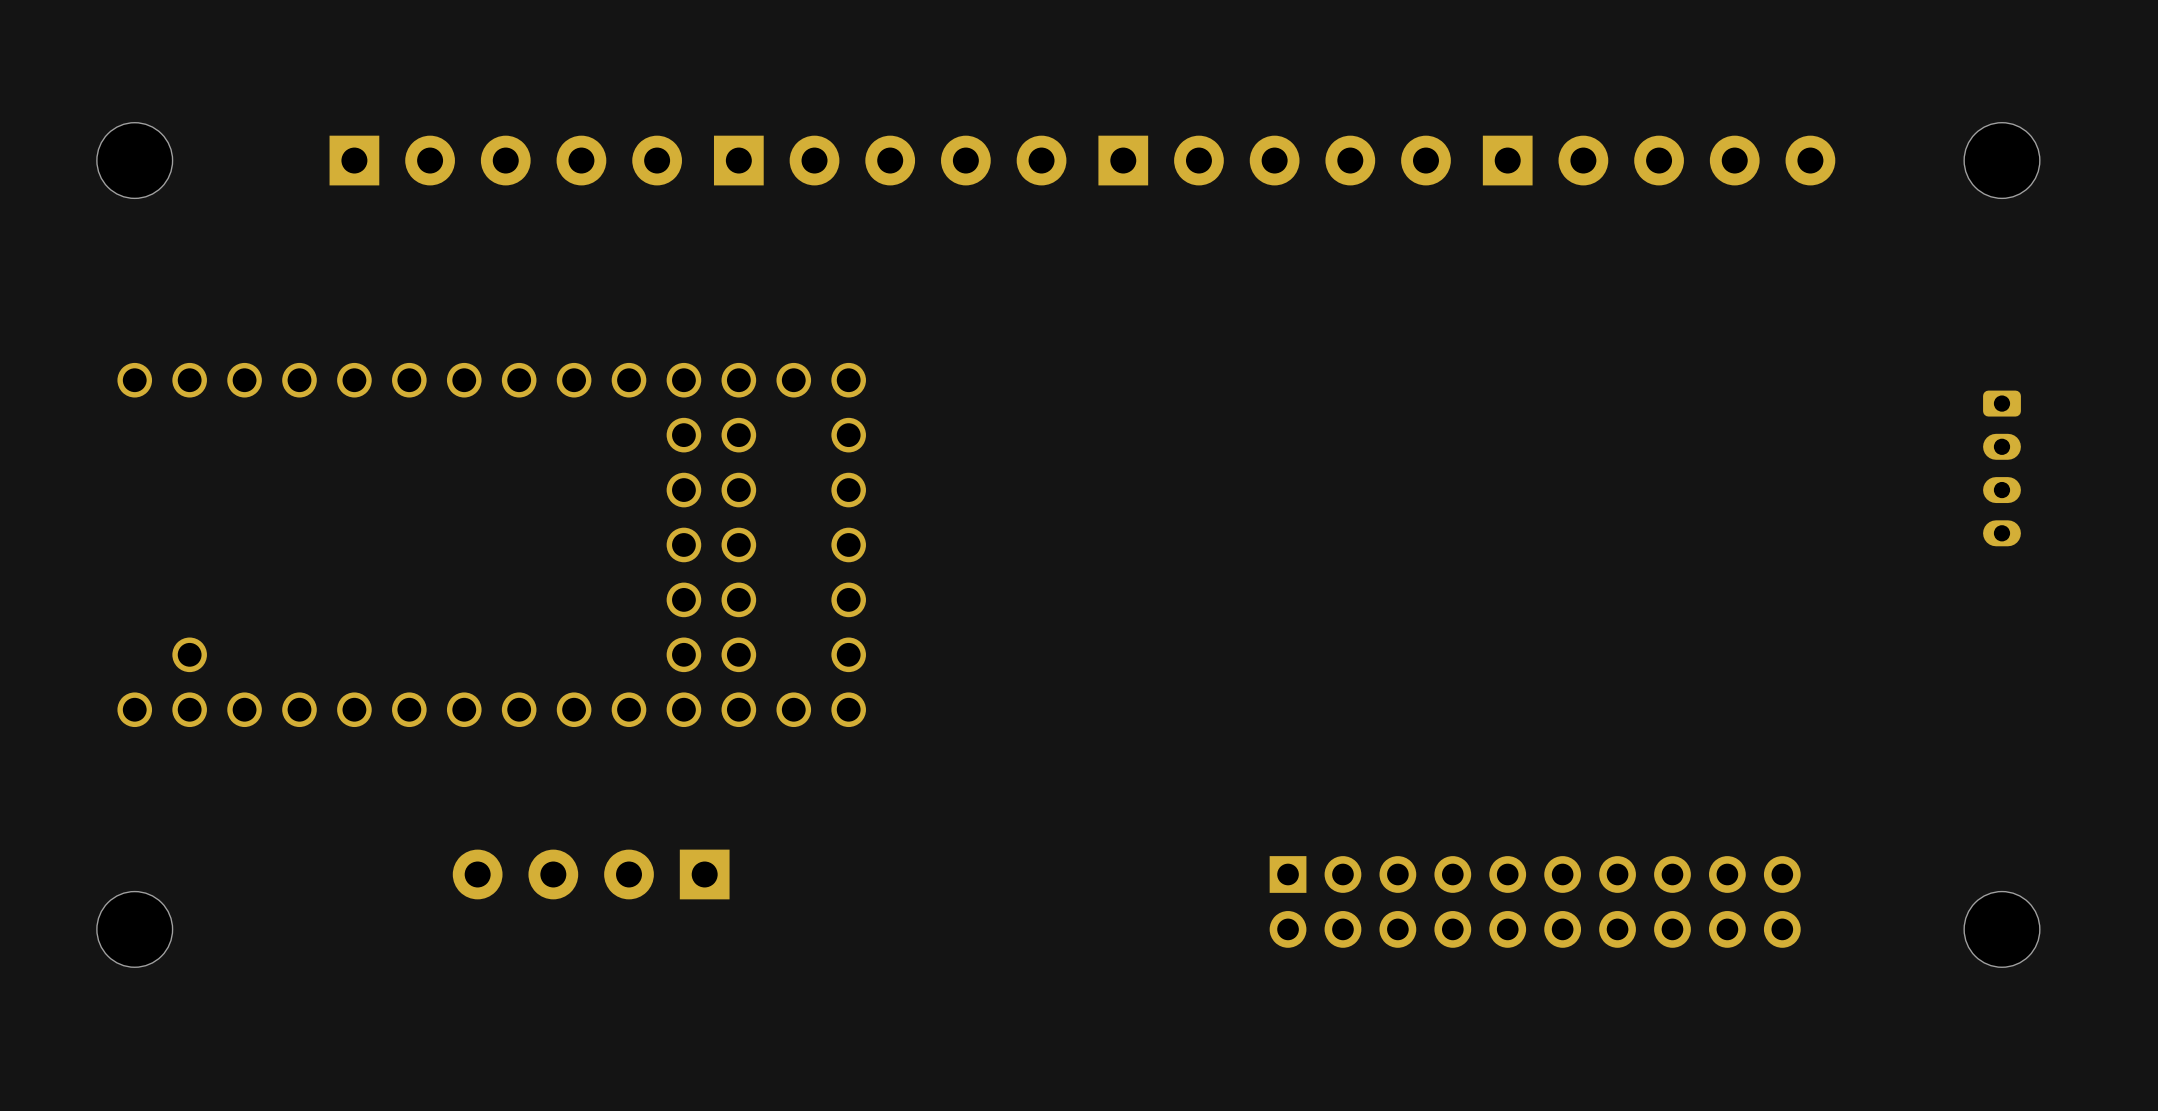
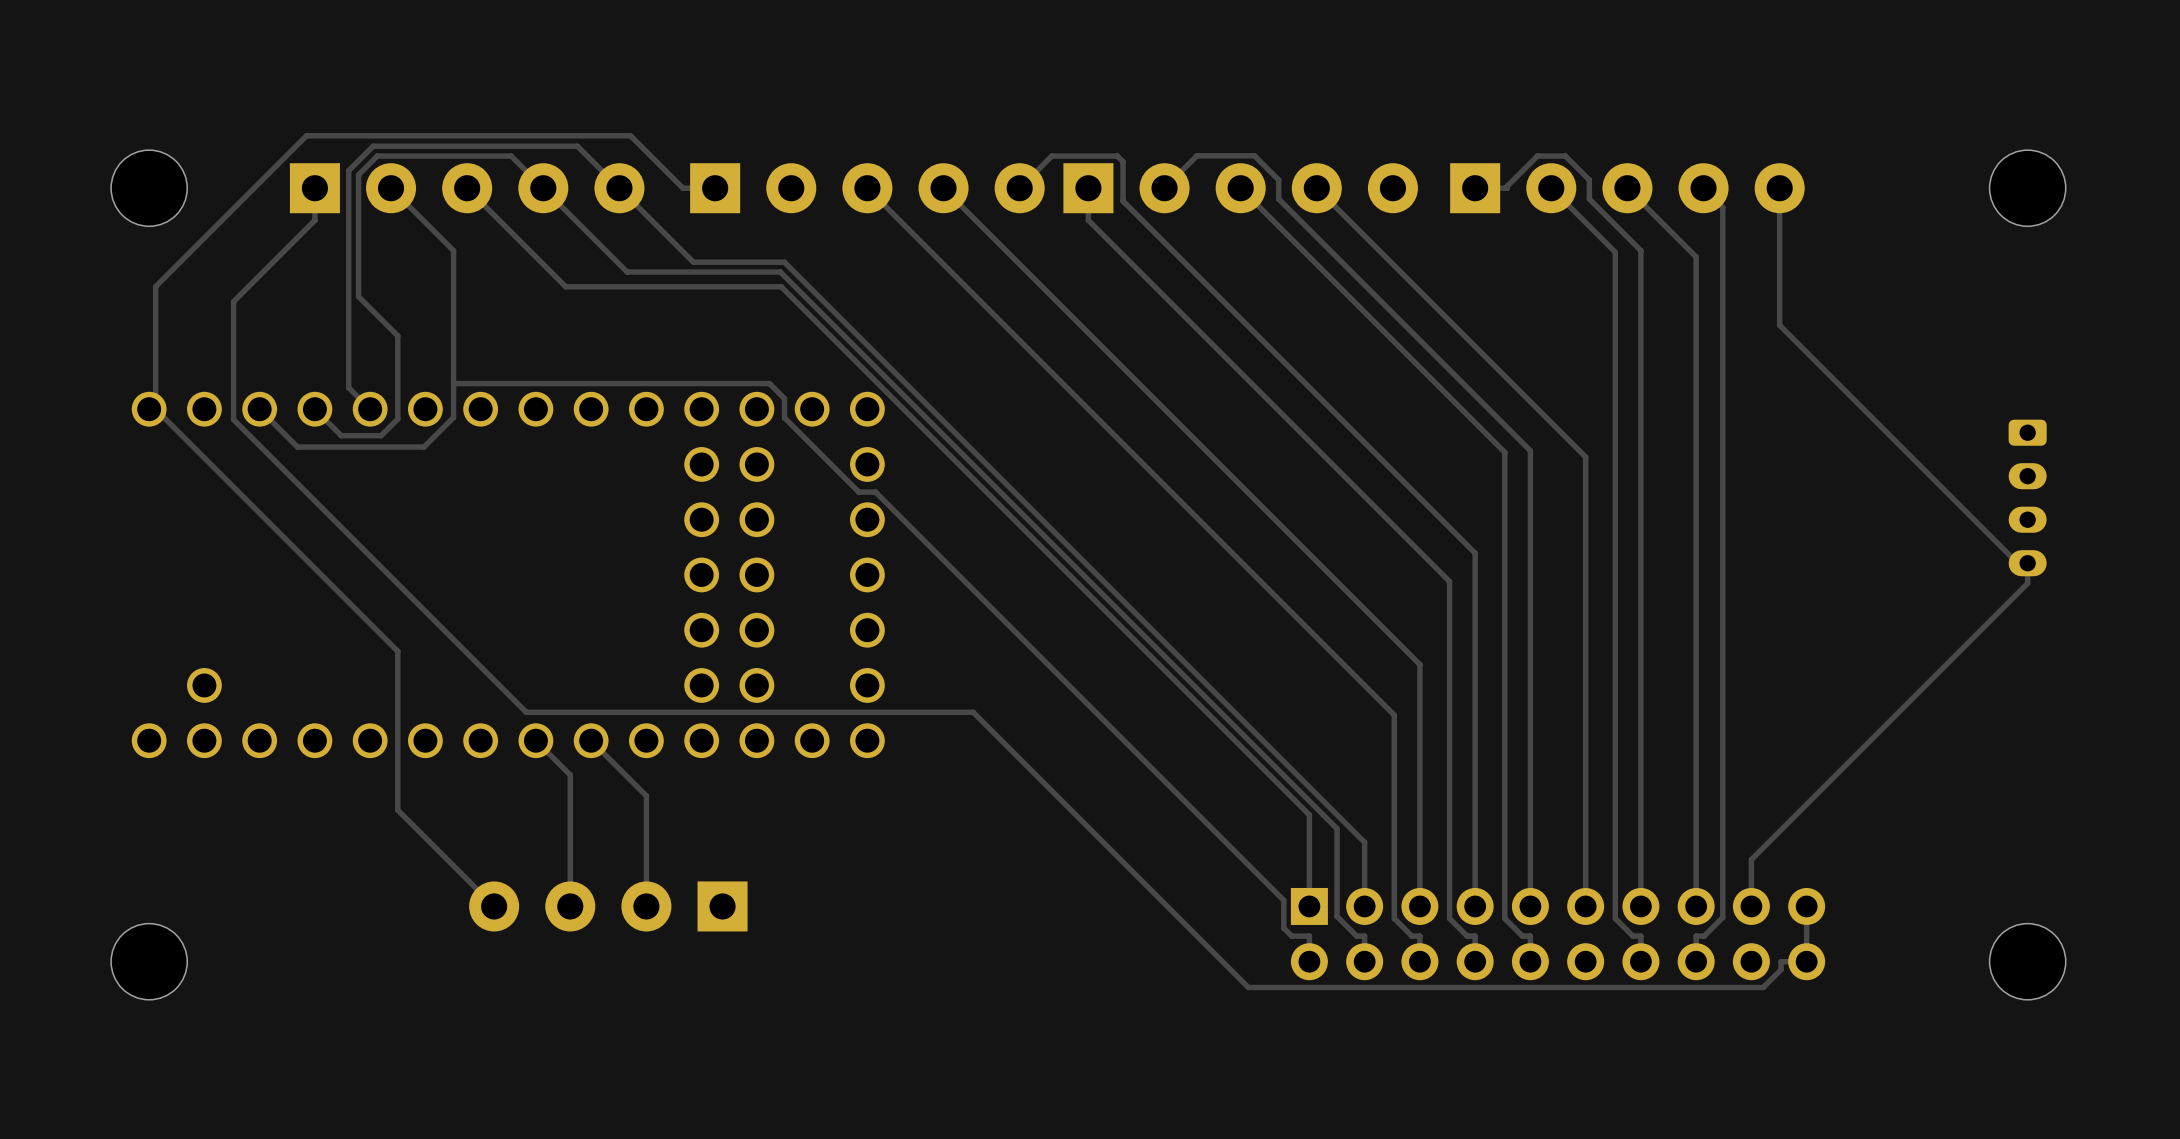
track: none -> (314, 188) (314, 220) (233, 301) (233, 419) (526, 712) (973, 712) (1248, 987) (1763, 987) (1781, 969) (1781, 961) (1806, 961) (1806, 906)
track: none -> (391, 188) (453, 250) (453, 417) (424, 447) (297, 447) (259, 409)
track: none -> (467, 188) (565, 286) (781, 286) (1309, 814) (1309, 906)
part position: (505, 160) -> (467, 188)
track: none -> (715, 188) (683, 188) (630, 135) (306, 135) (155, 286) (155, 409)
track: none -> (867, 188) (1394, 715) (1394, 918) (1411, 936) (1419, 936) (1419, 961)
part position: (890, 160) -> (867, 188)
track: none -> (943, 188) (1419, 664) (1419, 906)
track: none -> (1019, 188) (1051, 156) (1117, 156) (1123, 161) (1123, 201) (1475, 553) (1475, 906)
track: none -> (1088, 188) (1088, 220) (1449, 581) (1449, 918) (1467, 936) (1475, 936) (1475, 961)
track: none -> (1164, 188) (1196, 155) (1254, 155) (1278, 180) (1278, 199) (1530, 450) (1530, 906)
track: none -> (1240, 188) (1504, 452) (1504, 918) (1522, 936) (1530, 936) (1530, 961)
part position: (1274, 160) -> (1240, 188)
track: none -> (1316, 188) (1585, 457) (1585, 906)
track: none -> (1475, 188) (1507, 188) (1537, 156) (1565, 156) (1589, 180) (1589, 199) (1640, 250) (1640, 906)
track: none -> (1551, 188) (1615, 252) (1615, 918) (1632, 936) (1640, 936) (1640, 961)
track: none -> (1627, 188) (1696, 256) (1696, 906)
part position: (1659, 160) -> (1627, 188)
track: none -> (1703, 188) (1722, 207) (1722, 917) (1704, 936) (1696, 936) (1696, 961)
track: none -> (1779, 188) (1779, 325) (2027, 573)
track: none -> (453, 383) (769, 383) (784, 398) (784, 417) (858, 492) (875, 492) (1283, 900) (1283, 928) (1291, 936) (1309, 936) (1309, 961)
track: none -> (155, 409) (397, 651) (397, 810) (494, 906)
track: none -> (314, 409) (341, 435) (381, 435) (397, 419) (397, 335) (358, 296) (358, 174) (377, 156) (511, 156) (627, 272) (780, 272) (1337, 828) (1337, 916) (1356, 936) (1364, 936) (1364, 961)
track: none -> (370, 409) (348, 387) (348, 170) (373, 146) (577, 146) (693, 262) (784, 262) (1364, 842) (1364, 906)
track: none -> (2027, 563) (2027, 583) (1751, 859) (1751, 906)
track: none -> (535, 740) (570, 775) (570, 906)
track: none -> (591, 740) (646, 795) (646, 906)

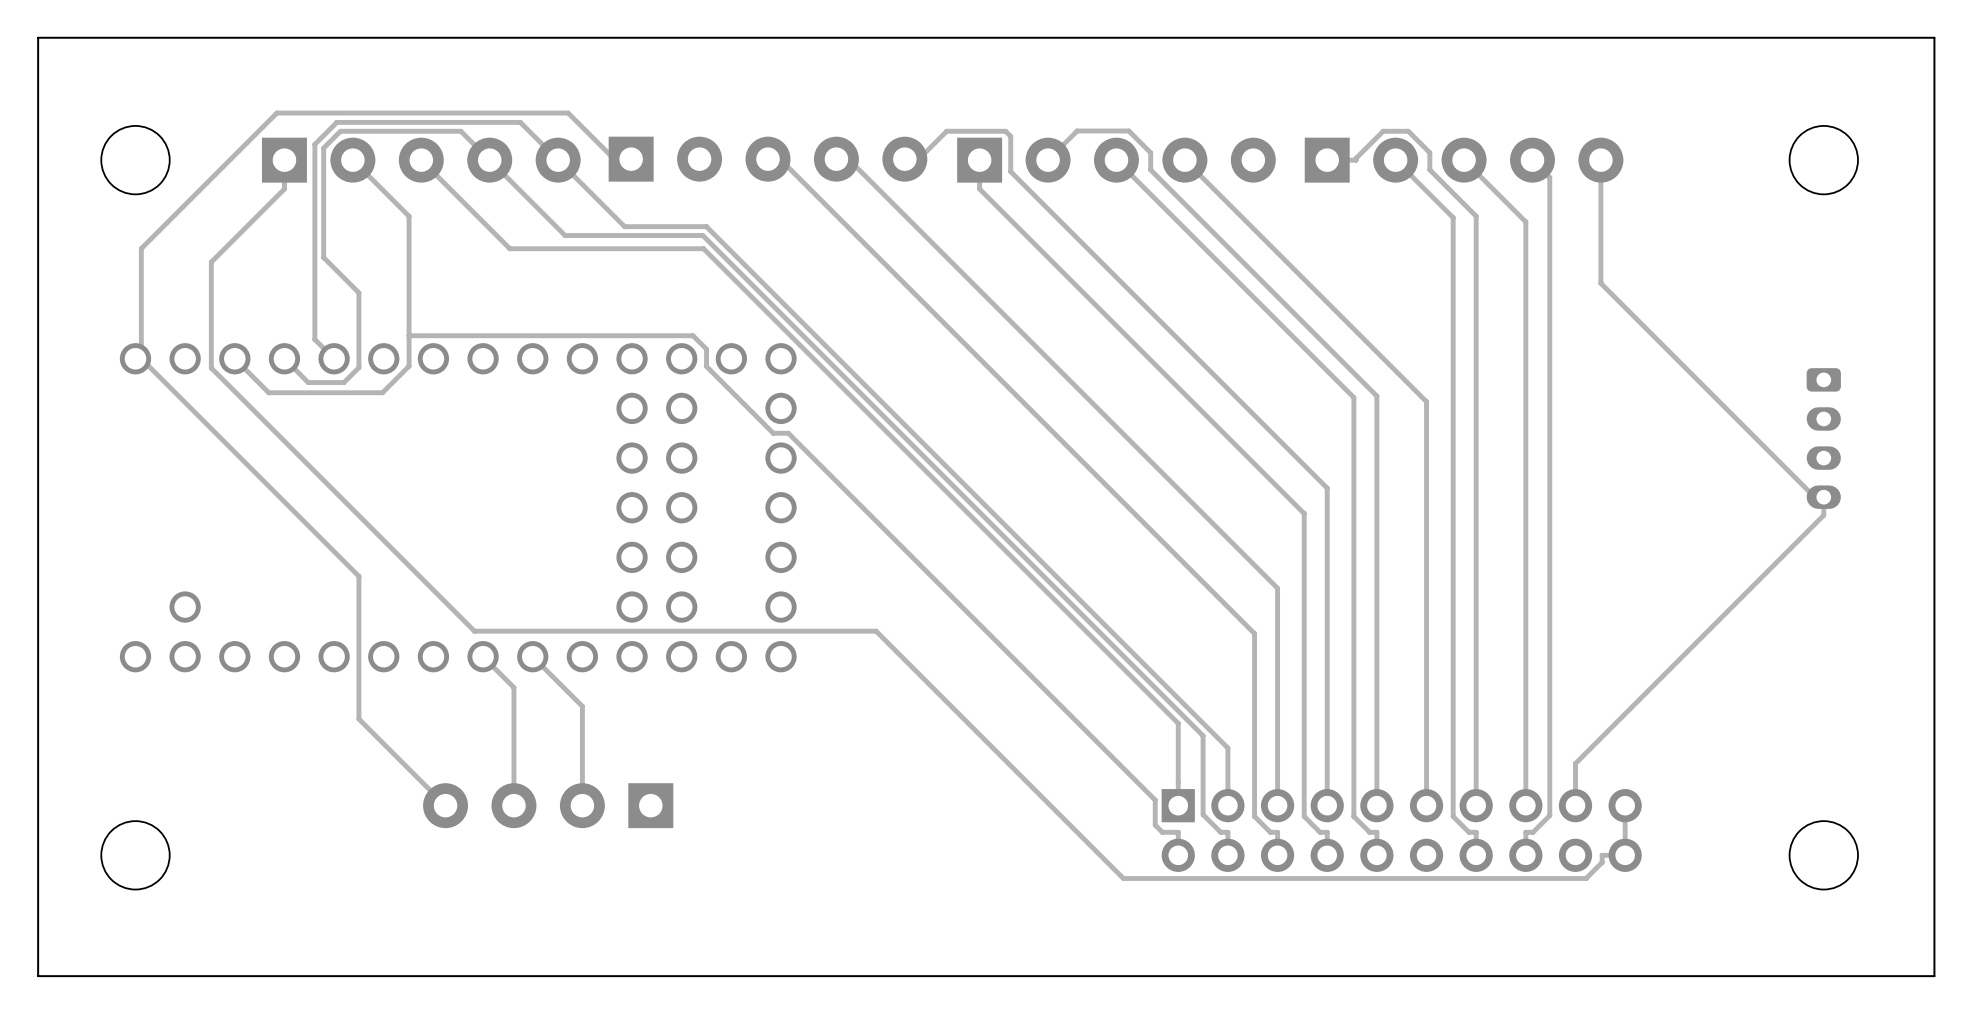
board edge: none -> (1934, 37) (38, 37) (38, 976) (1934, 976) (1934, 37)
part position: (867, 188) -> (768, 159)

